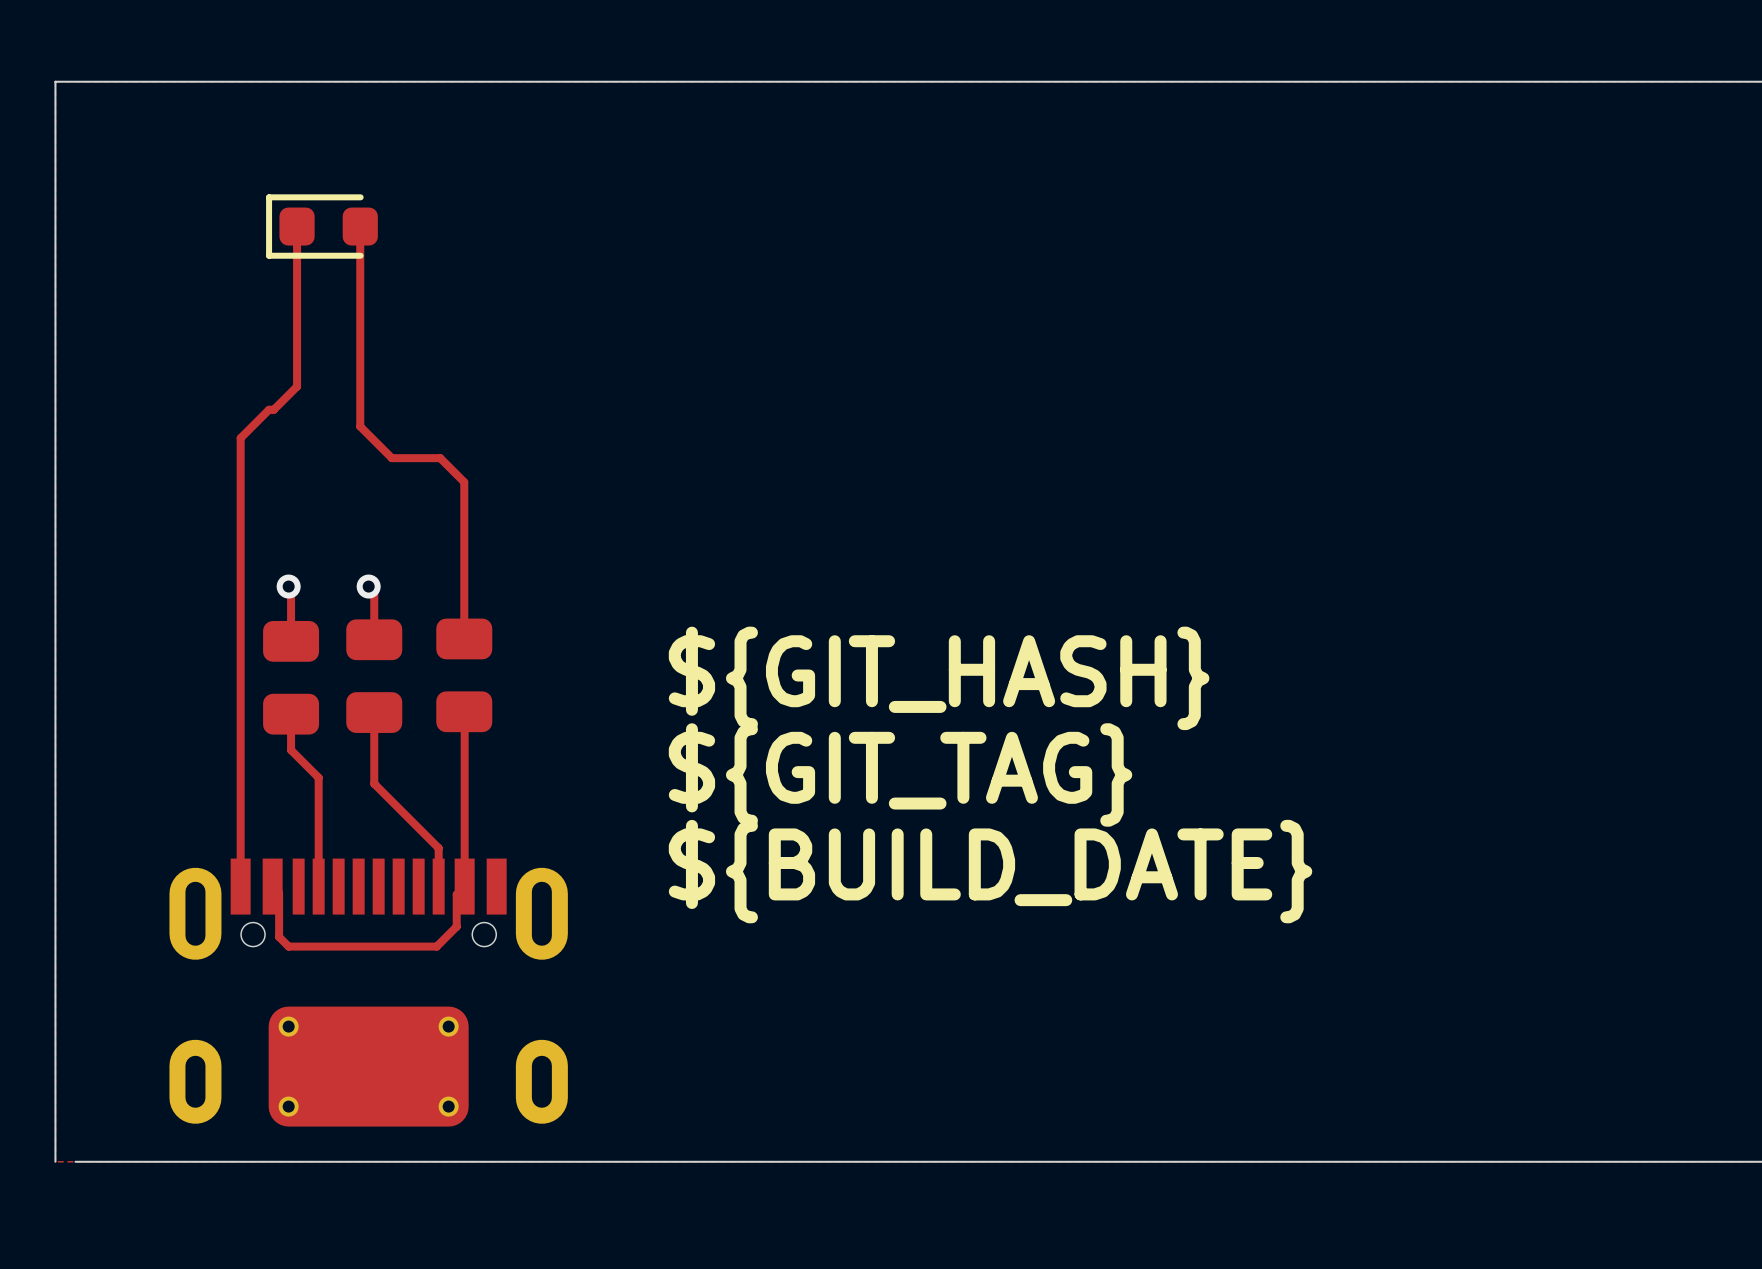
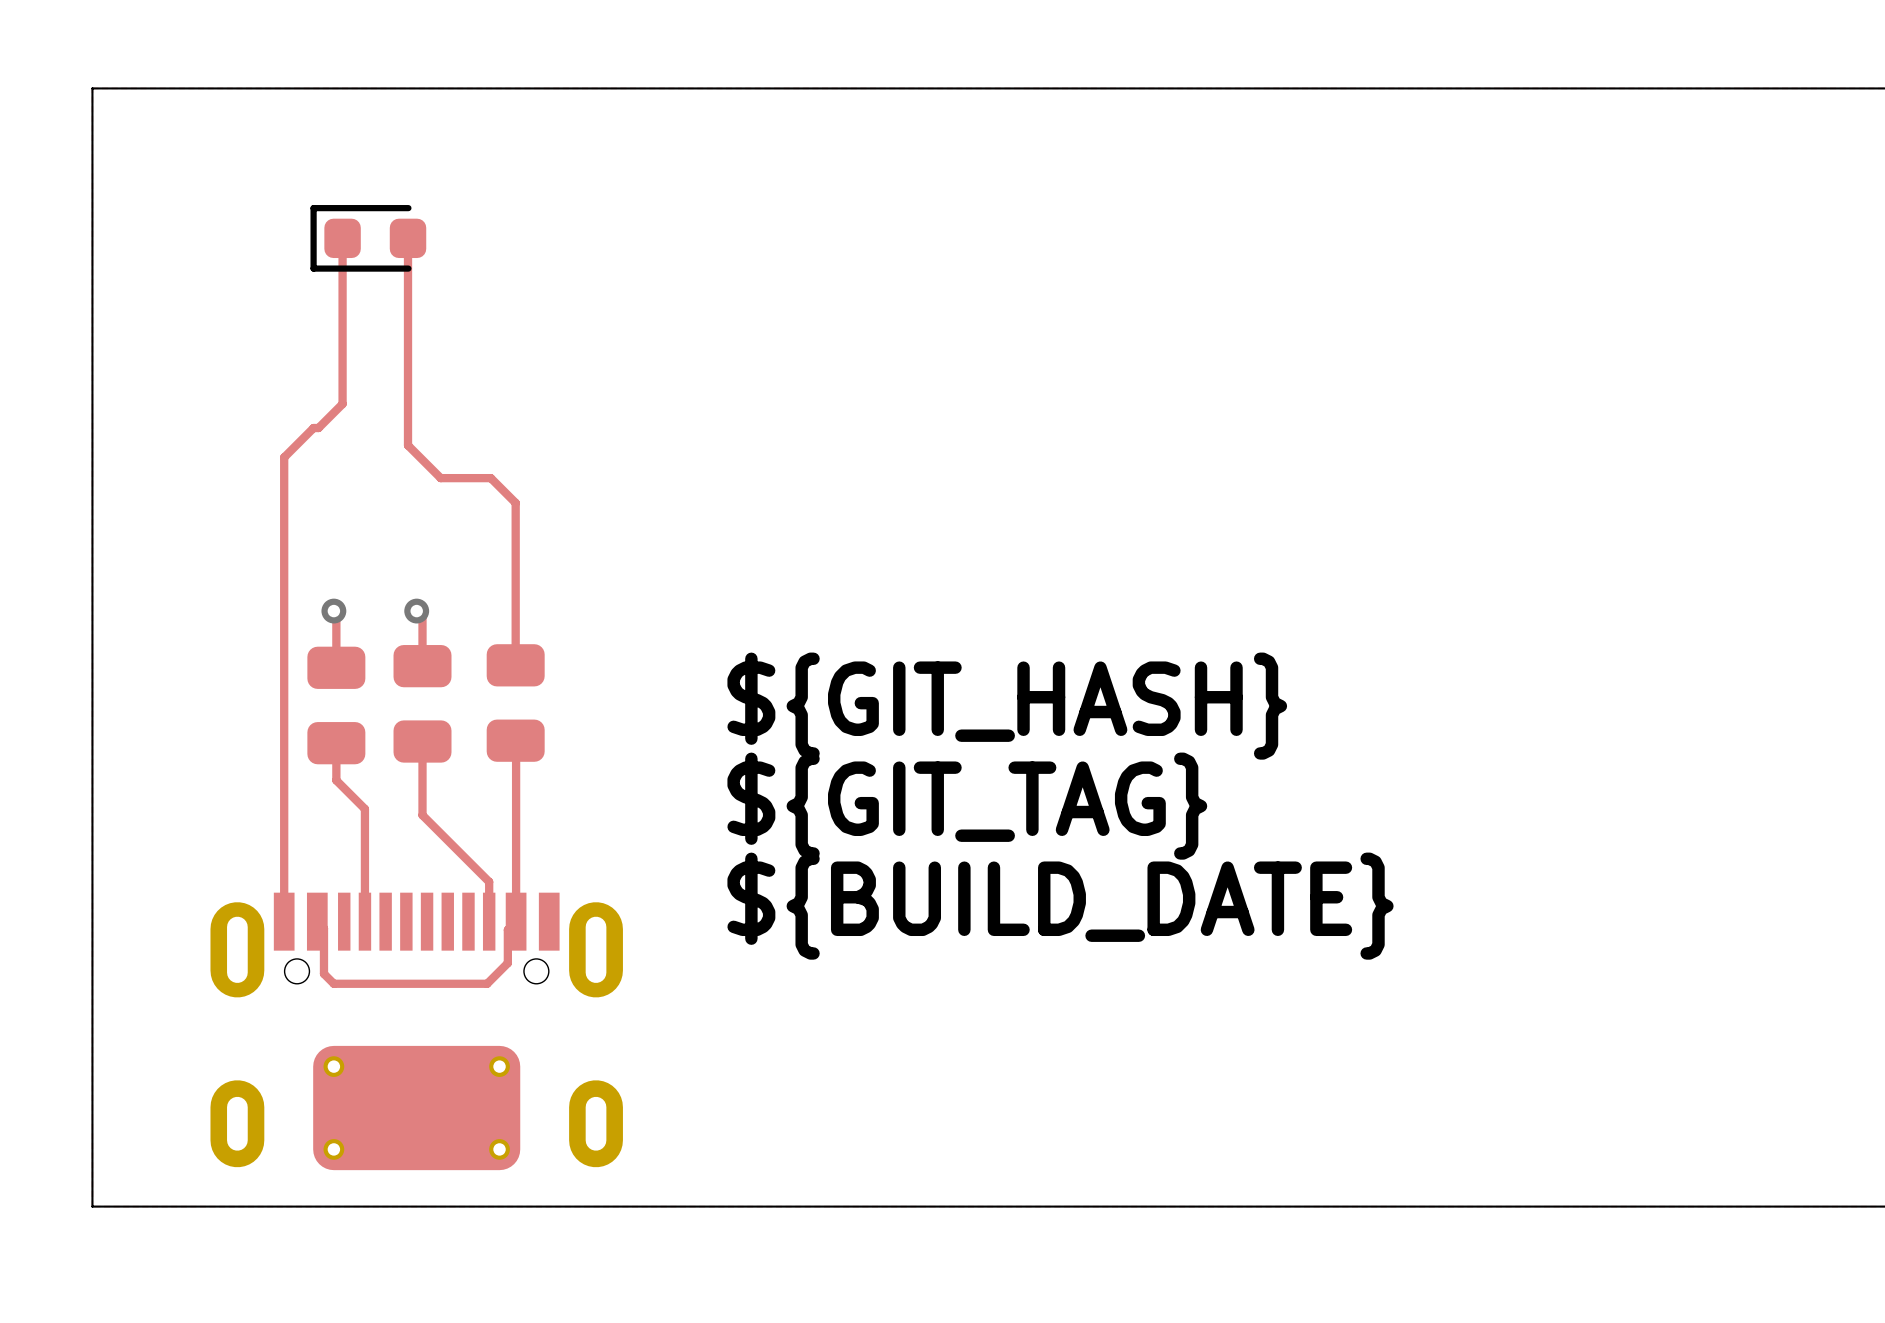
board edge: none -> (92, 1206) (113, 1206)

